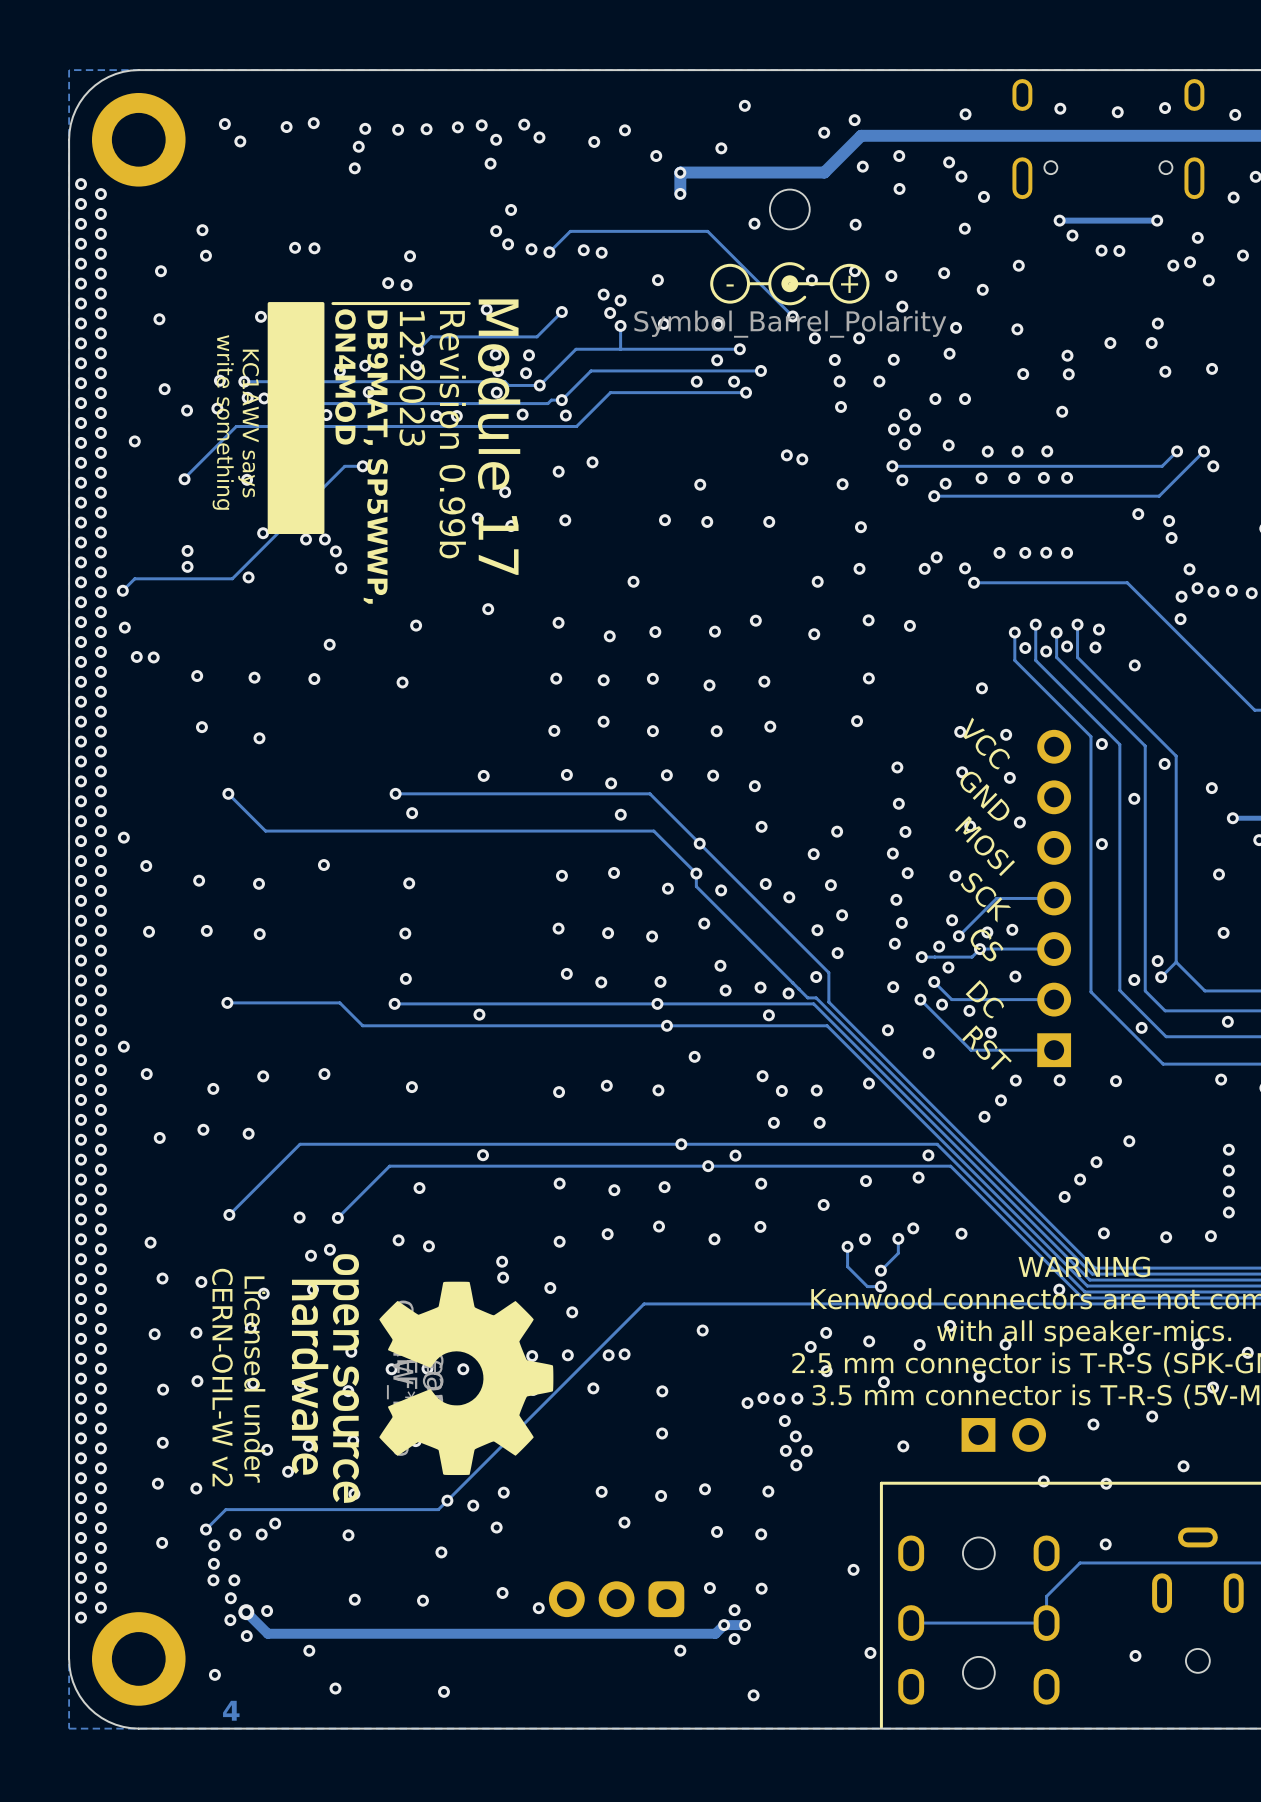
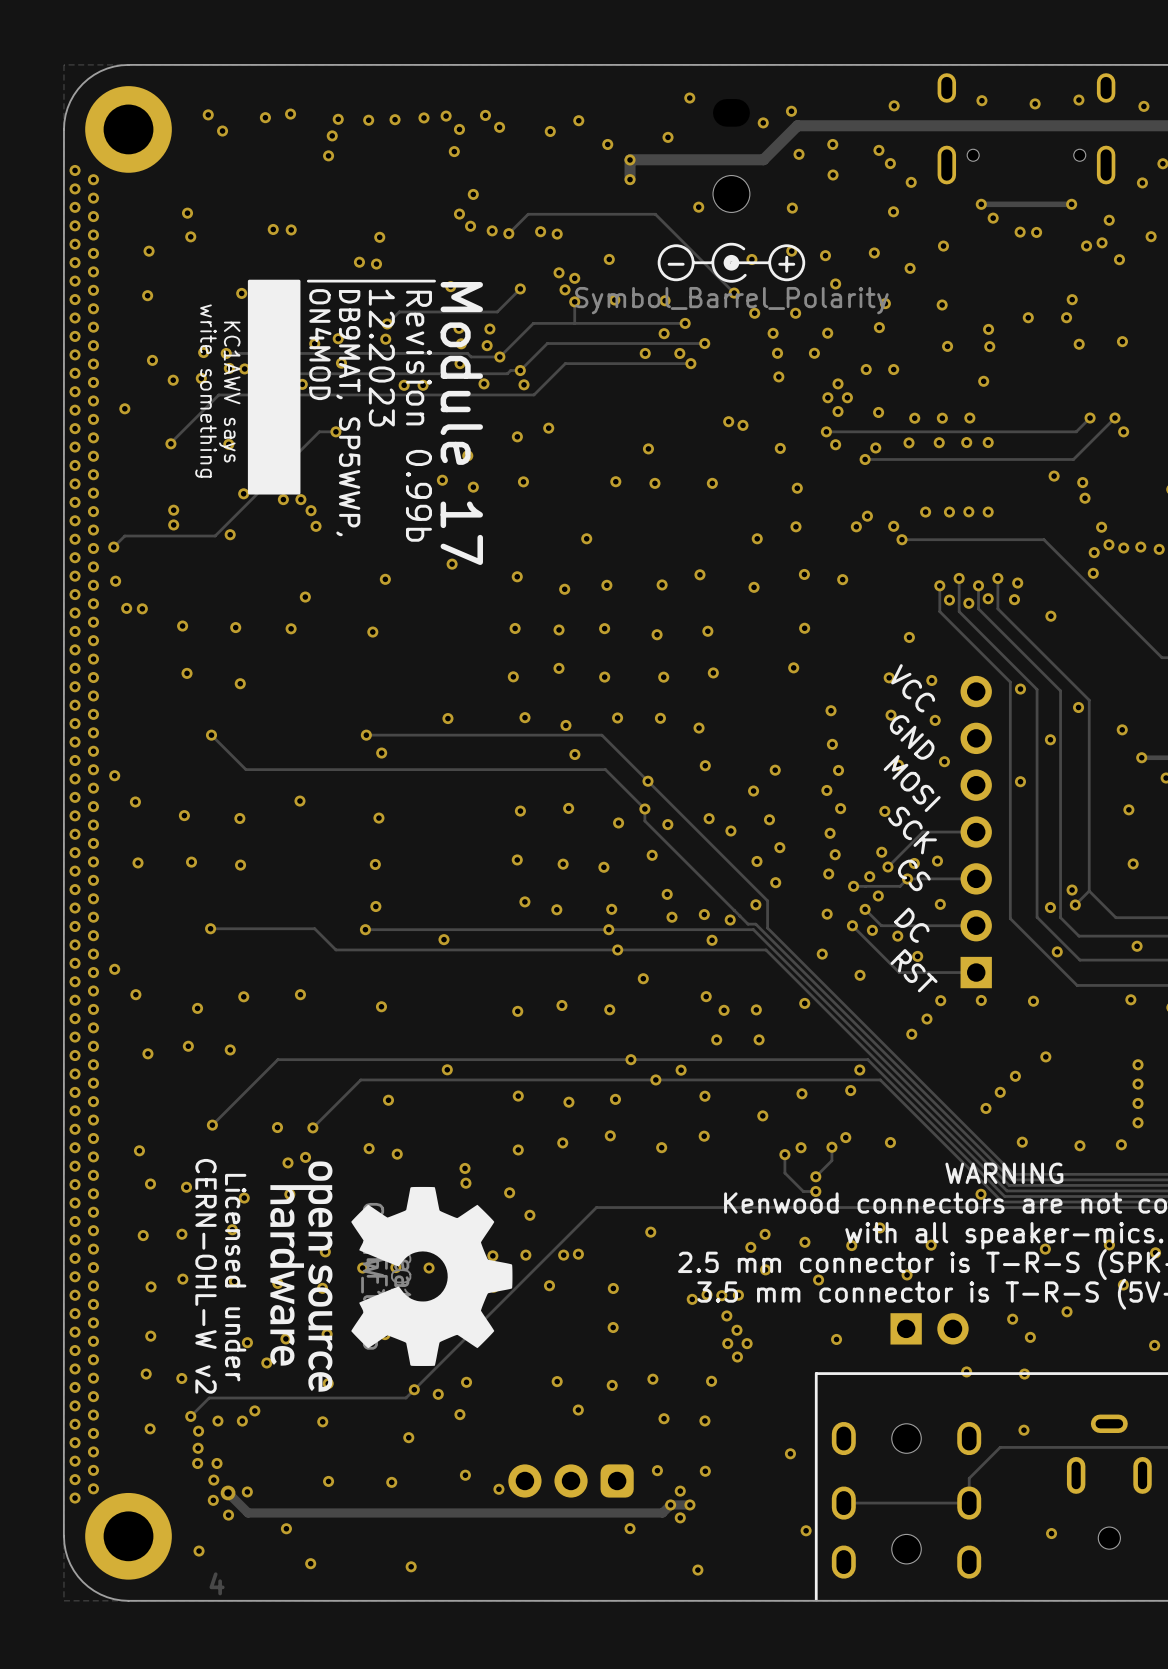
via: none -> (1030, 1337)
via: none -> (1154, 1345)
via: (1183, 1466) -> none

